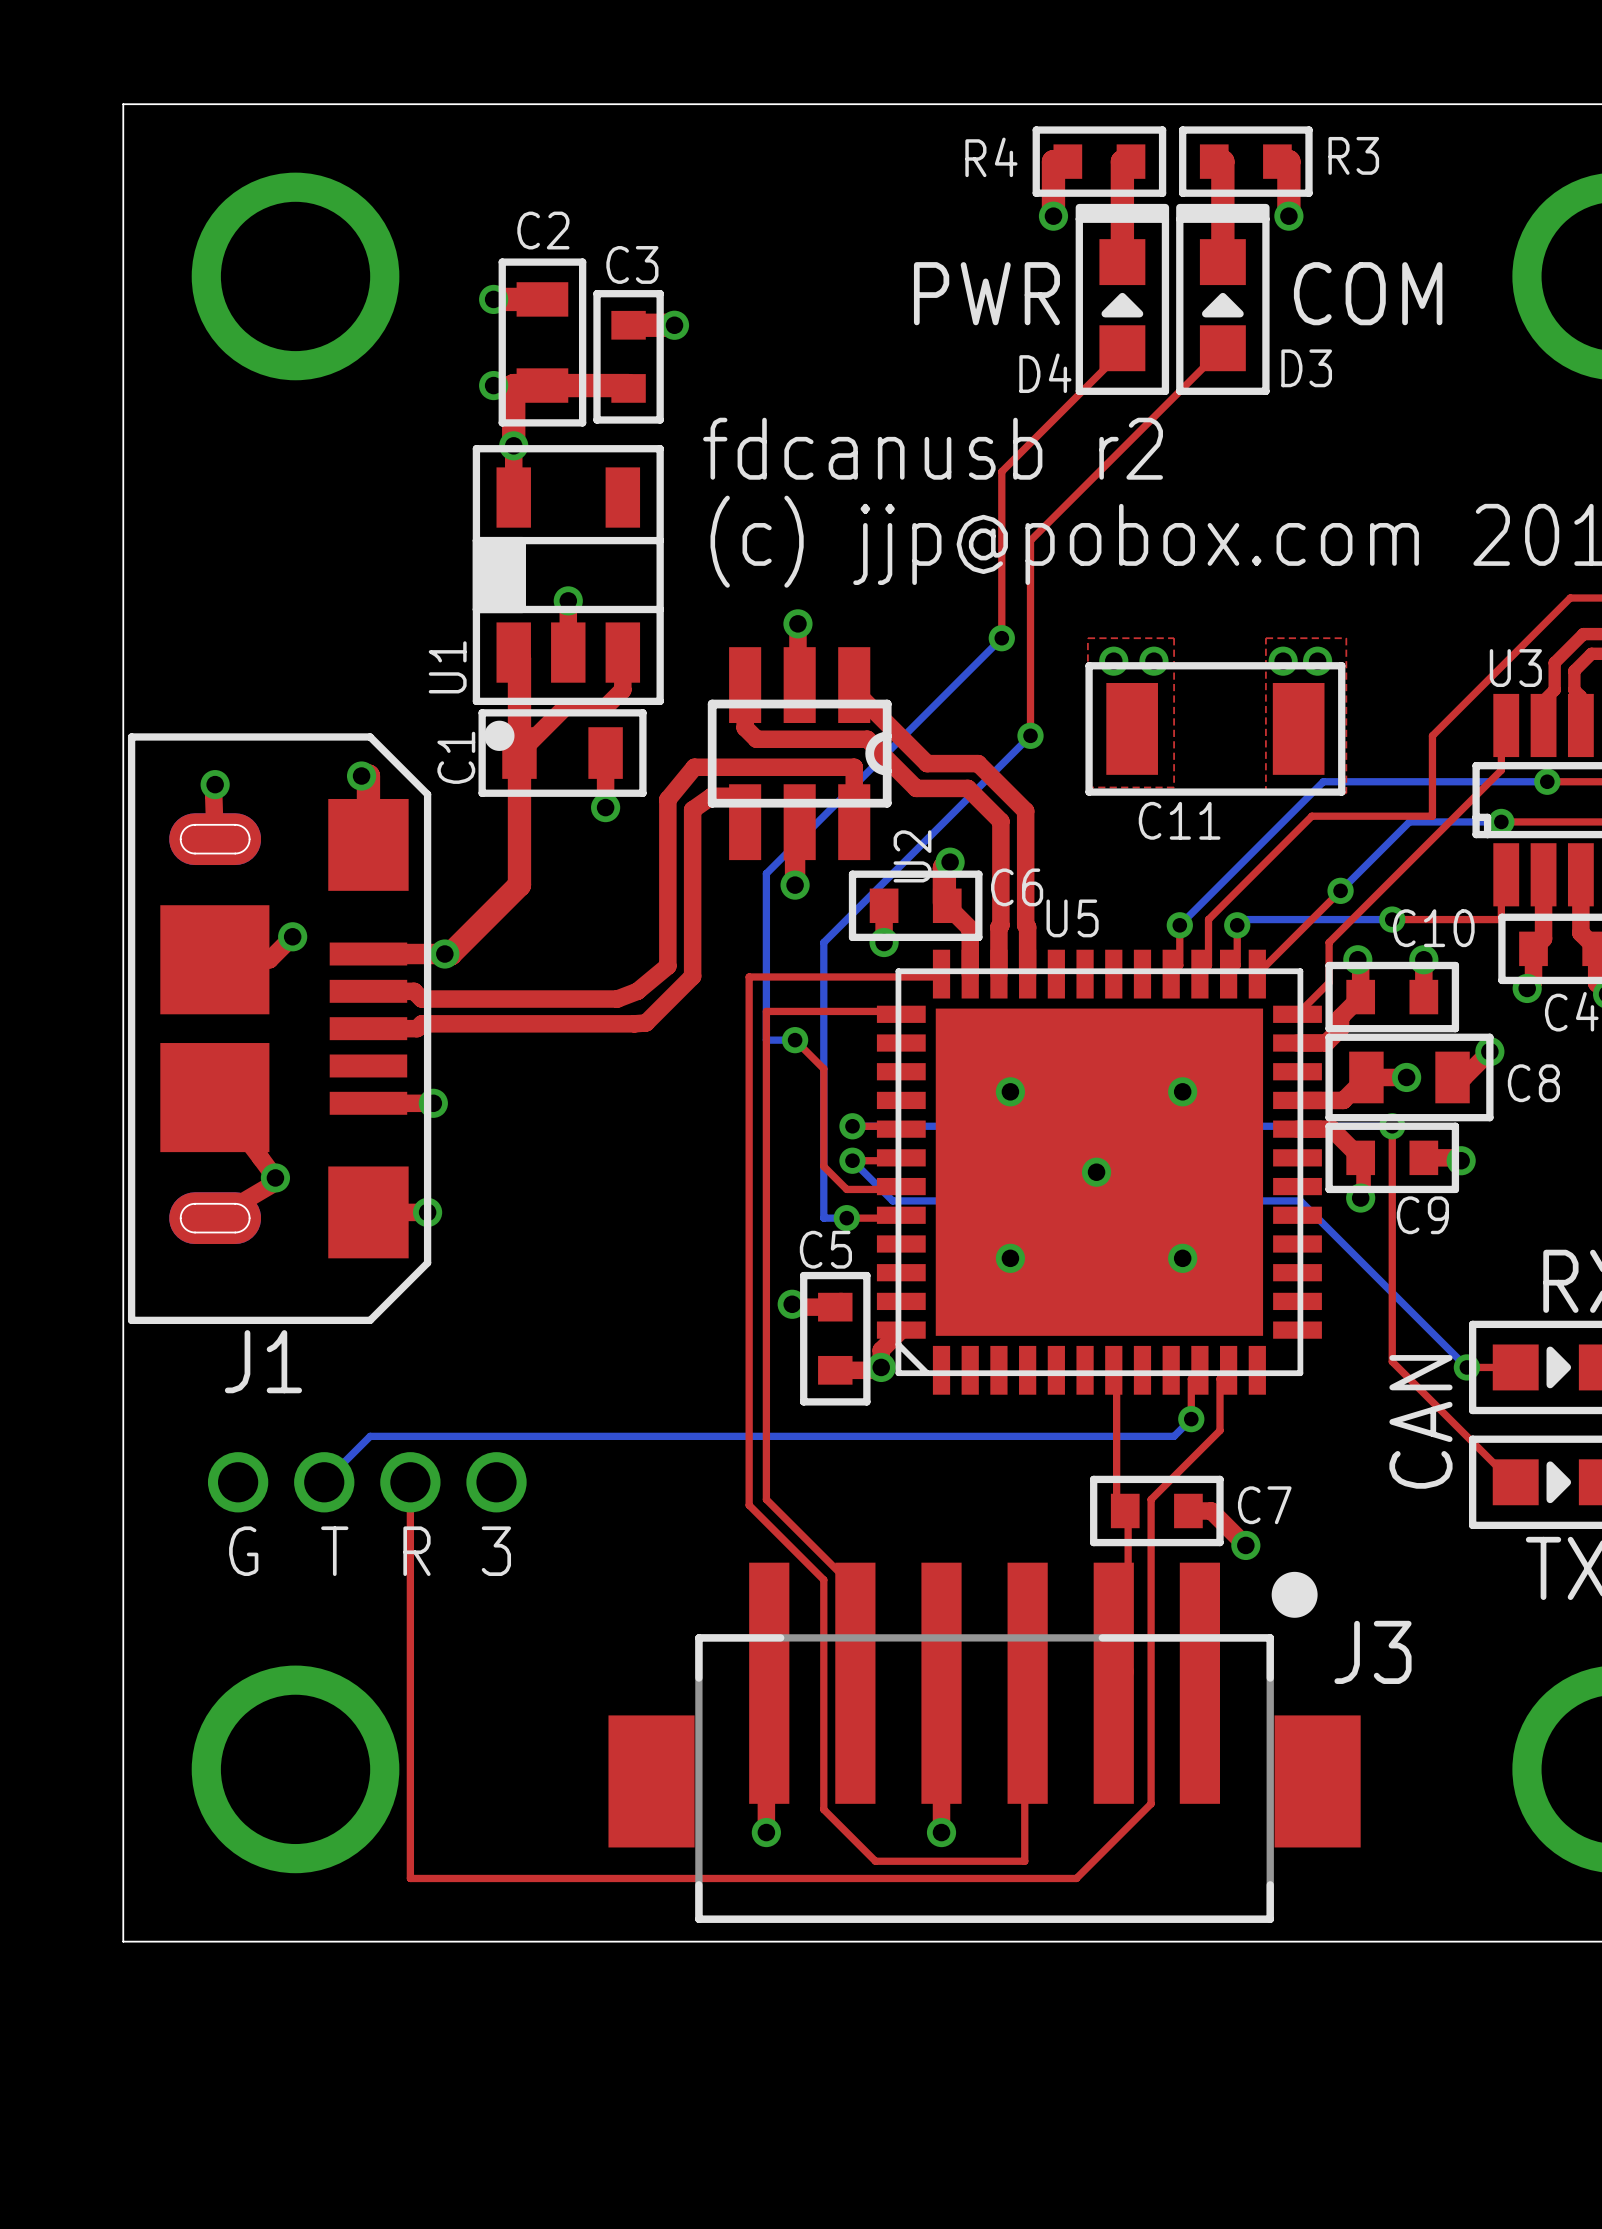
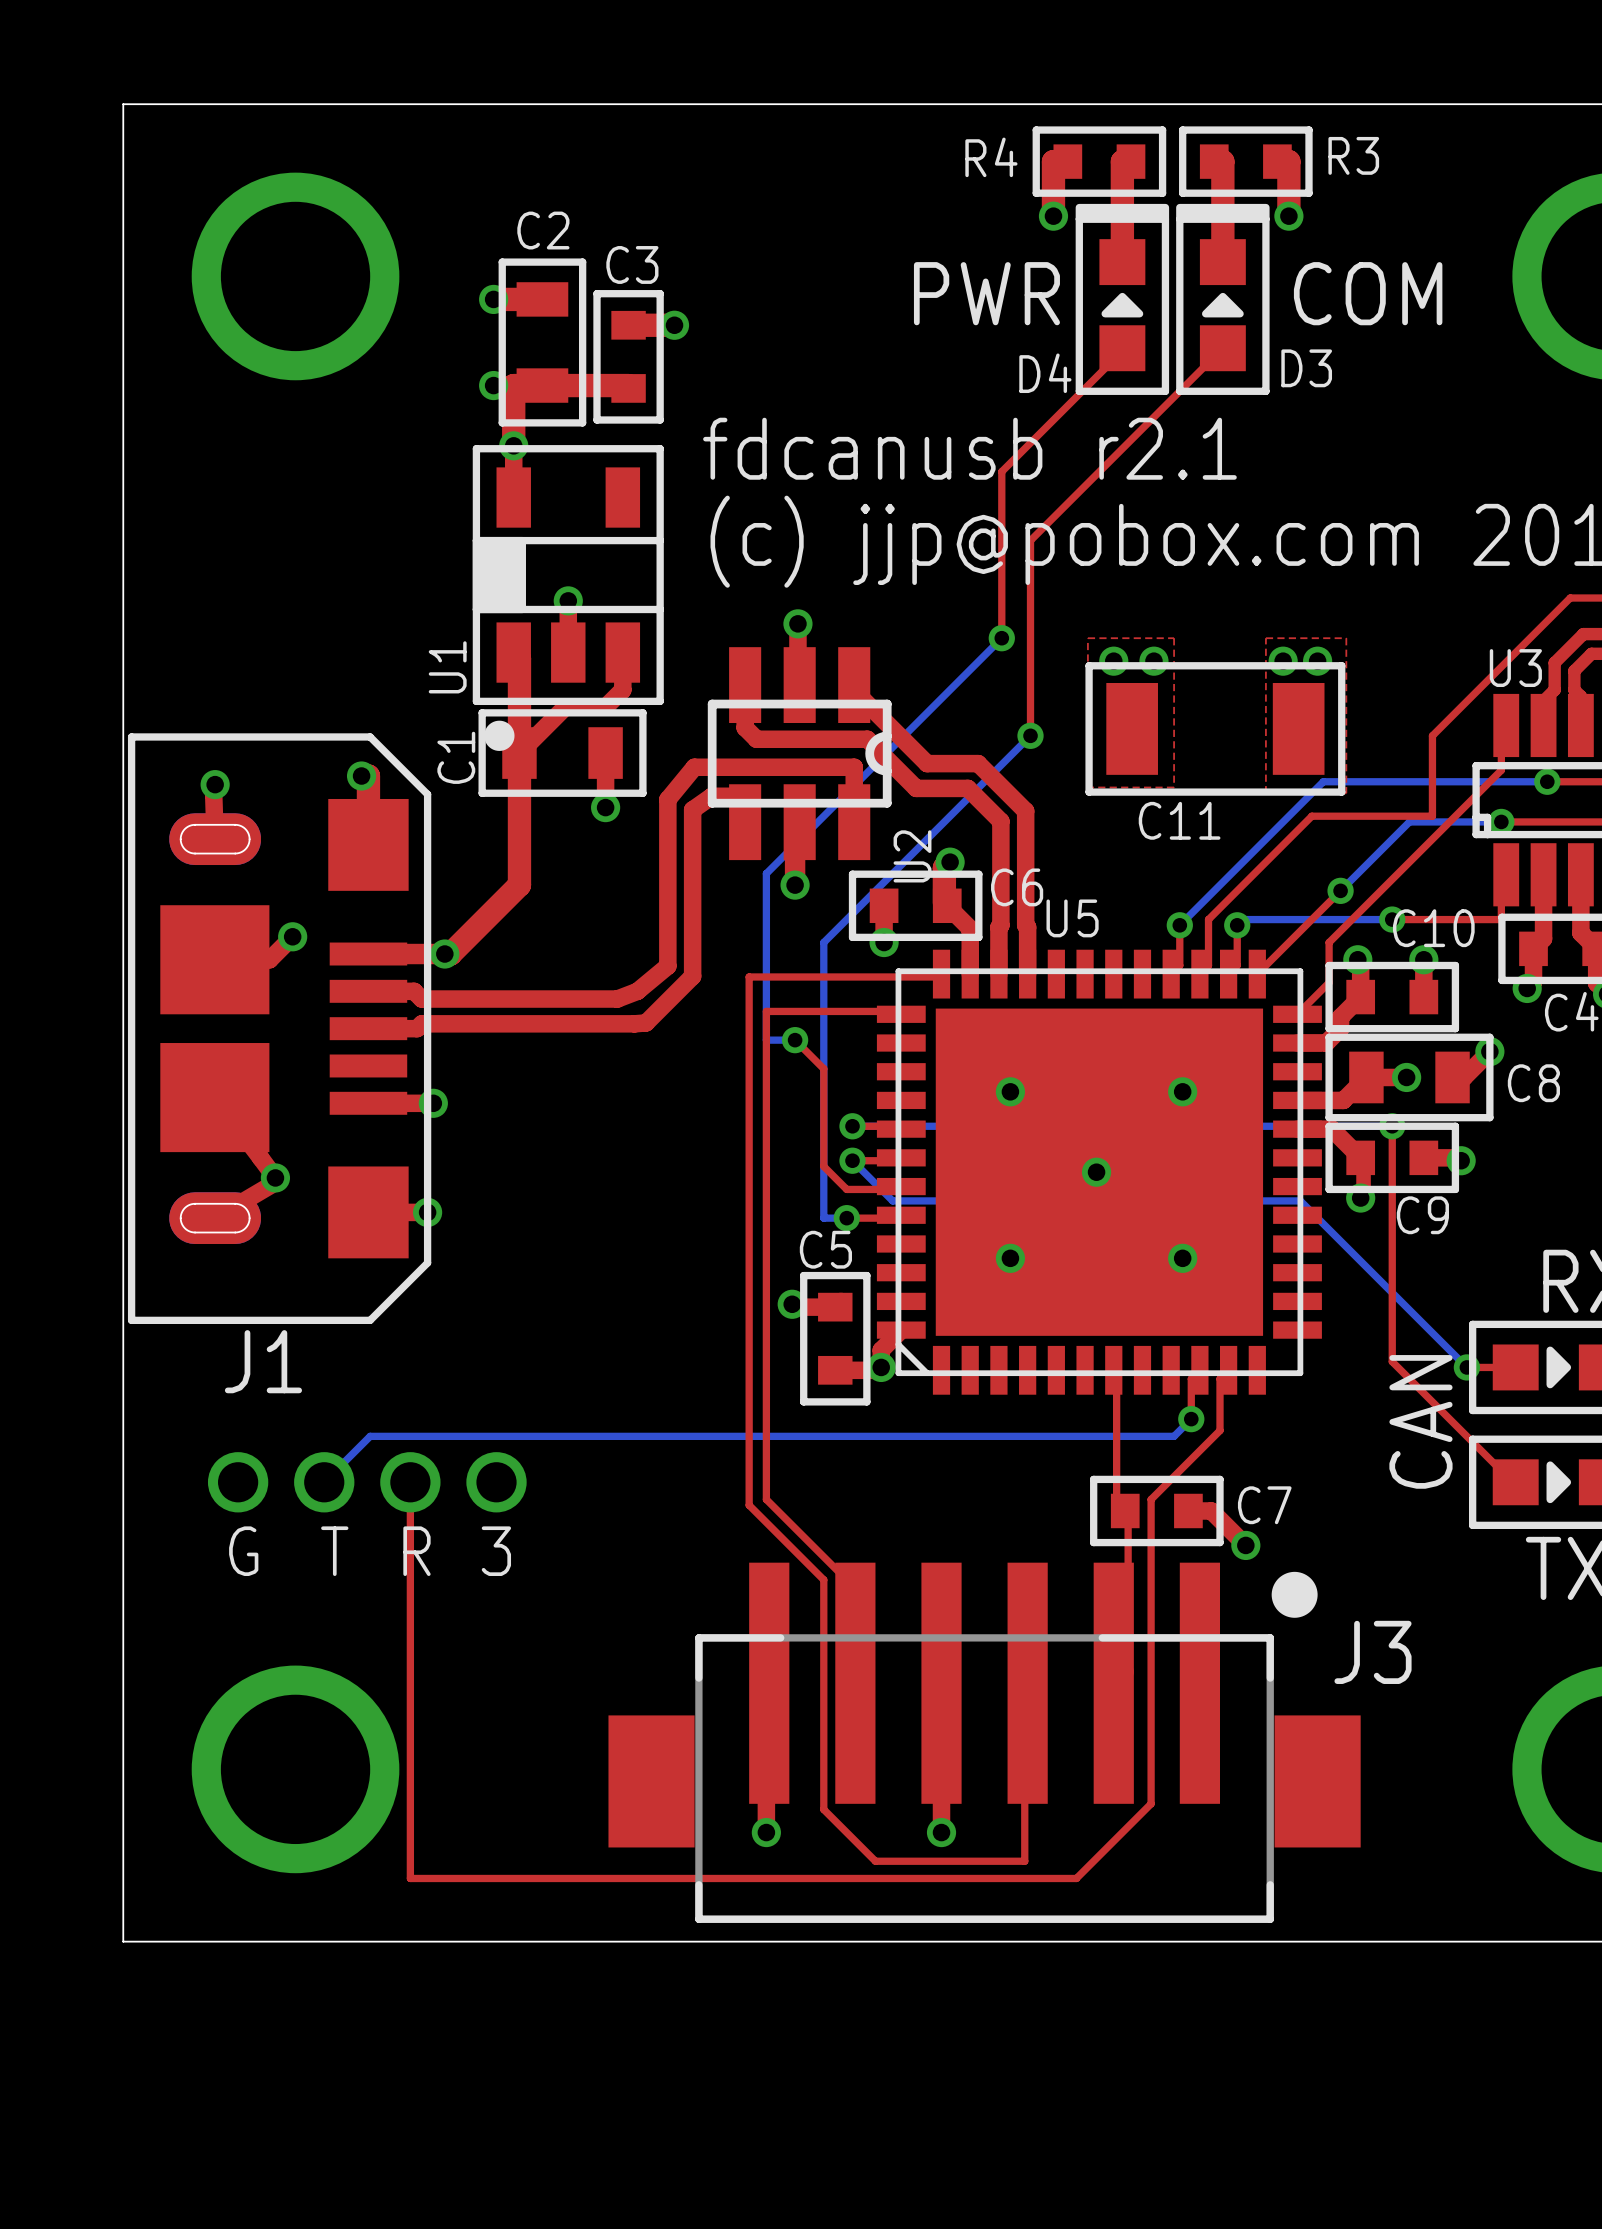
text: fdcanusb r2 (933, 448) -> fdcanusb r2.1 (969, 448)

